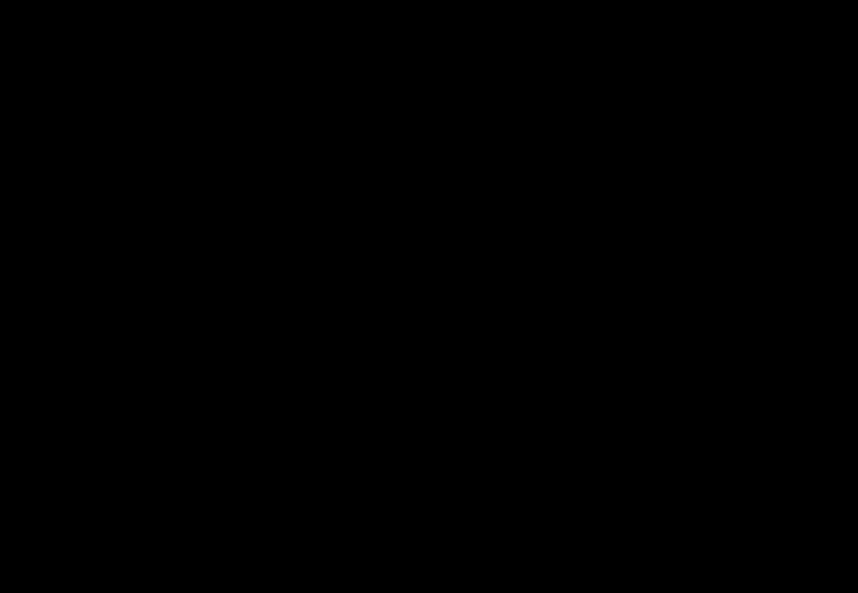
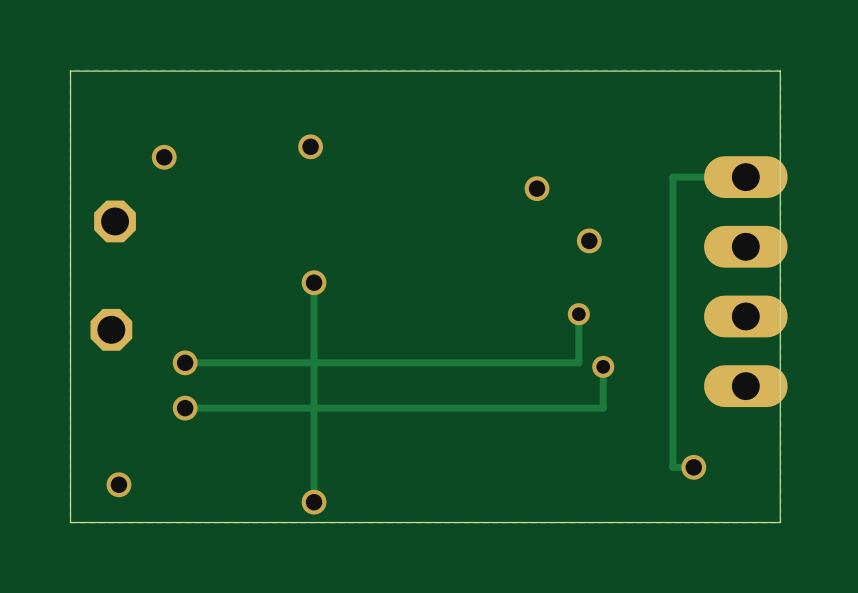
board edge: none -> (780, 71) (70, 71) (70, 522) (780, 522) (780, 71)
via: none -> (310, 146)
via: none -> (164, 157)
track: none -> (745, 177) (672, 177) (672, 467) (693, 467)
via: none -> (537, 188)
part: none -> (115, 221)
via: none -> (589, 240)
part: none -> (745, 281)
track: none -> (314, 282) (314, 502)
via: none -> (314, 282)
track: none -> (578, 314) (578, 362) (185, 362)
via: none -> (578, 314)
part: none -> (111, 329)
via: none -> (185, 362)
track: none -> (603, 366) (603, 408) (185, 408)
via: none -> (603, 366)
via: none -> (185, 408)
via: none -> (693, 467)
via: none -> (118, 484)
via: none -> (314, 502)

